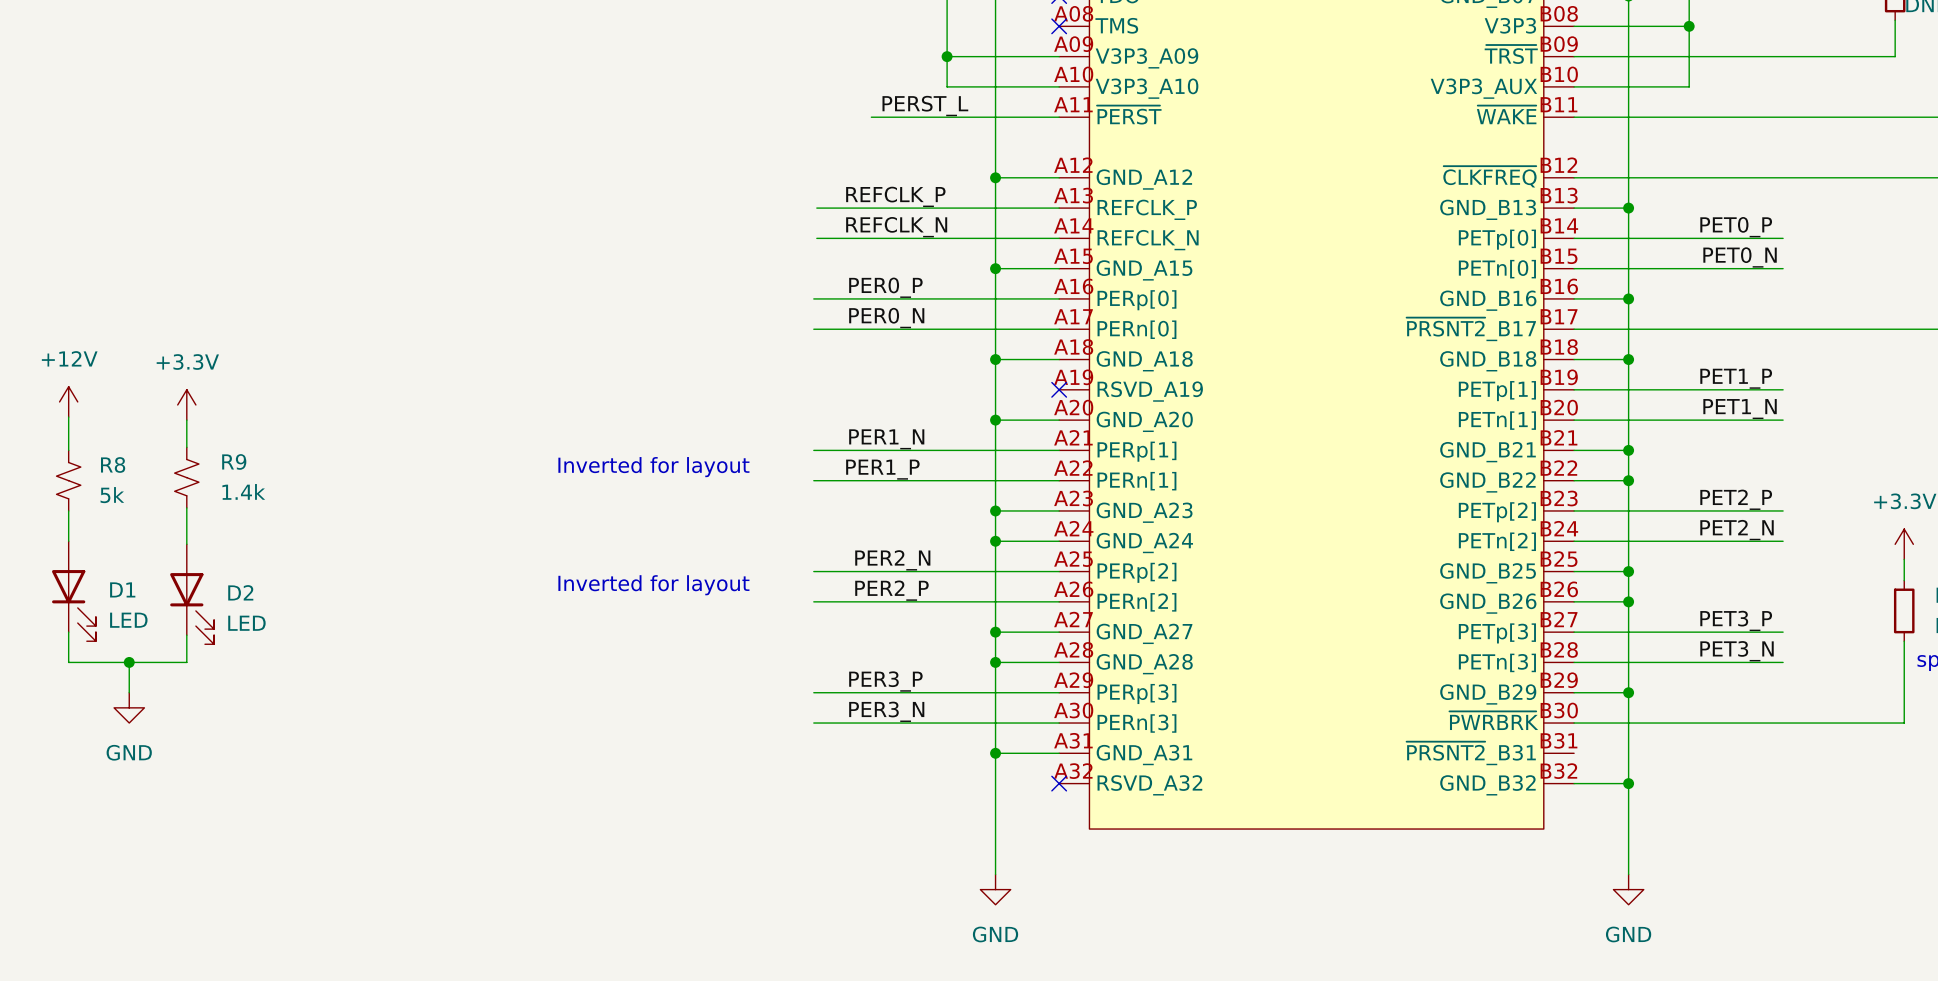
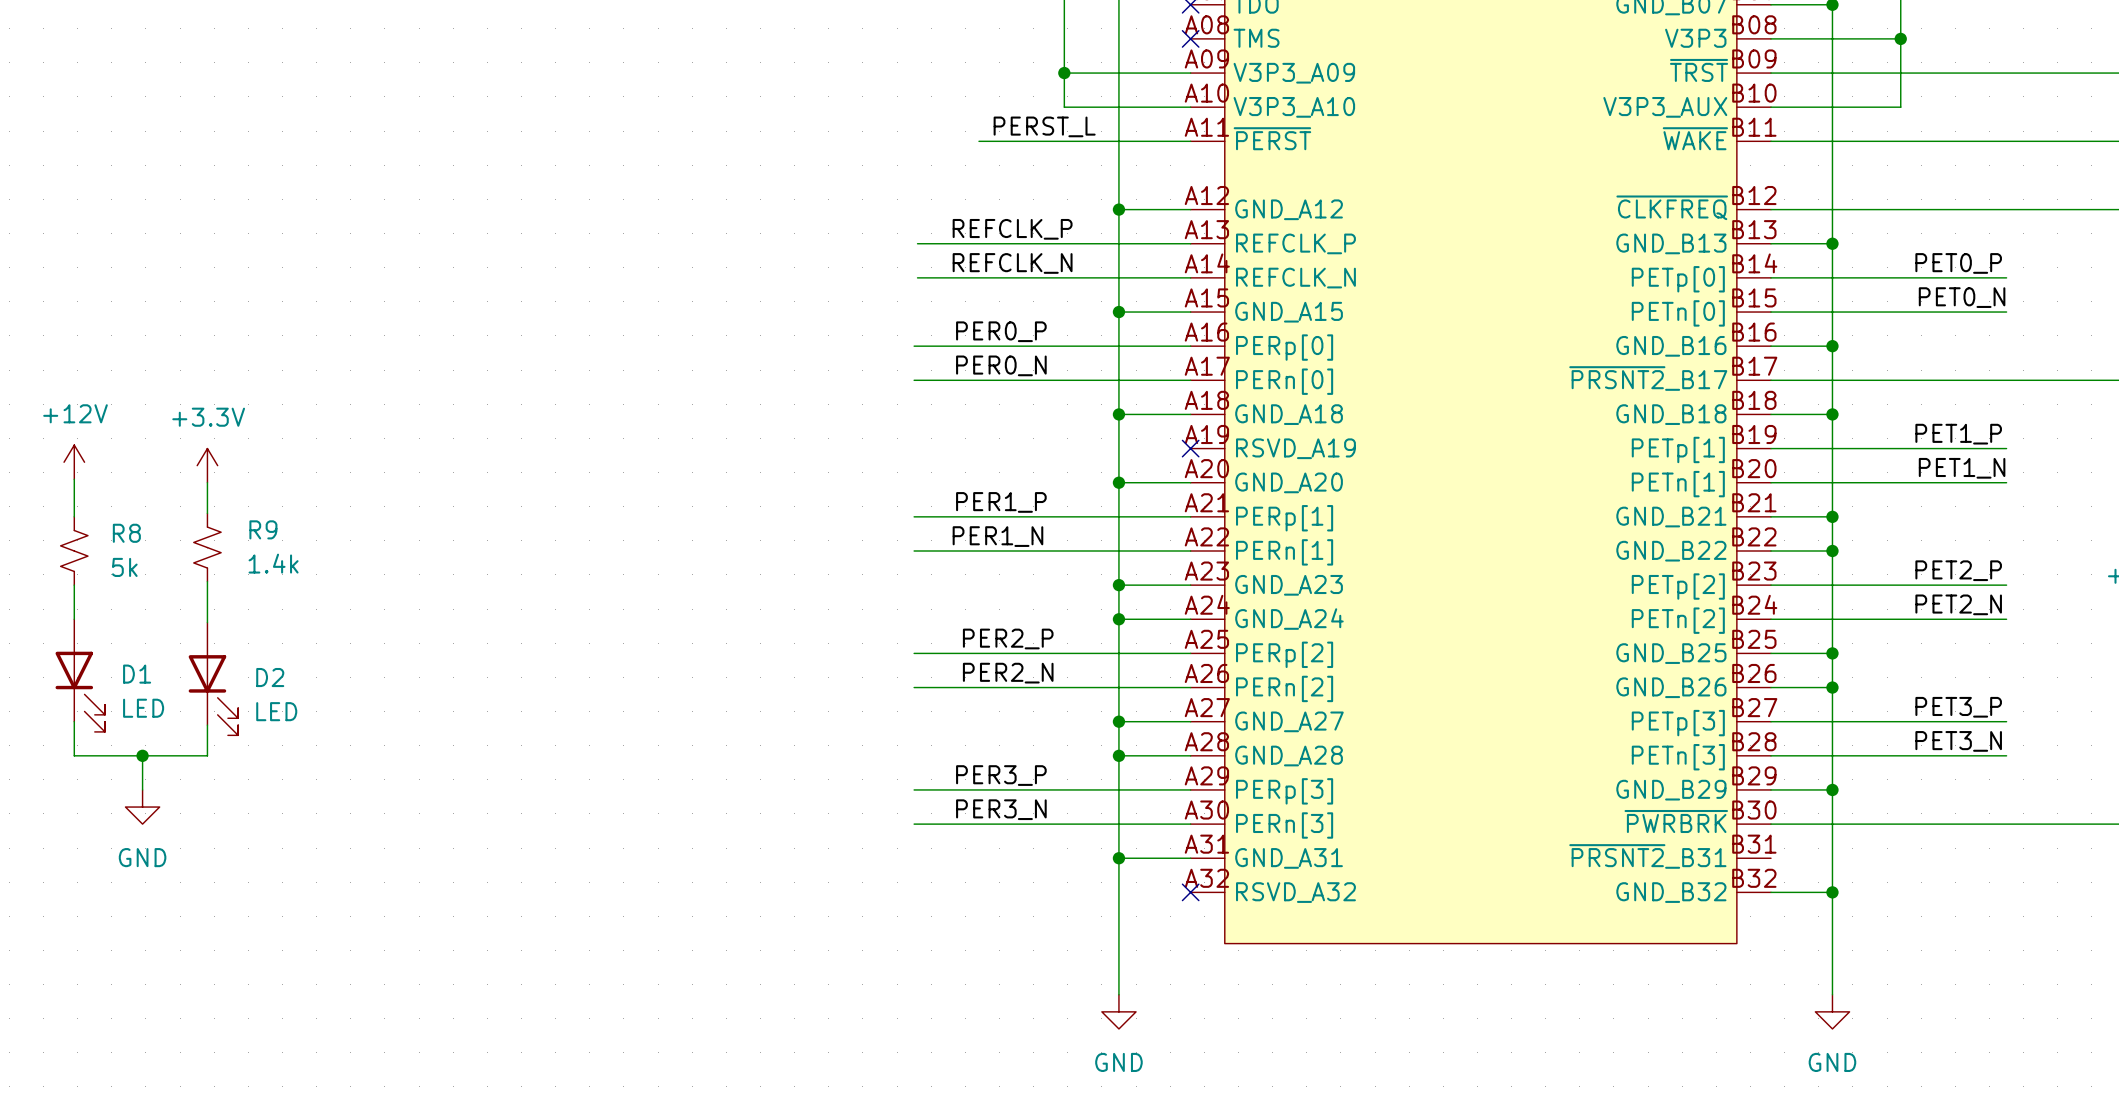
label: PER1_N (886, 439) -> PER1_P (1001, 502)
text: Inverted for layout (653, 467) -> none
label: PER1_P (882, 469) -> PER1_N (997, 536)
label: PER2_N (892, 560) -> PER2_P (1008, 638)
text: Inverted for layout (653, 585) -> none
label: PER2_P (891, 590) -> PER2_N (1008, 673)

